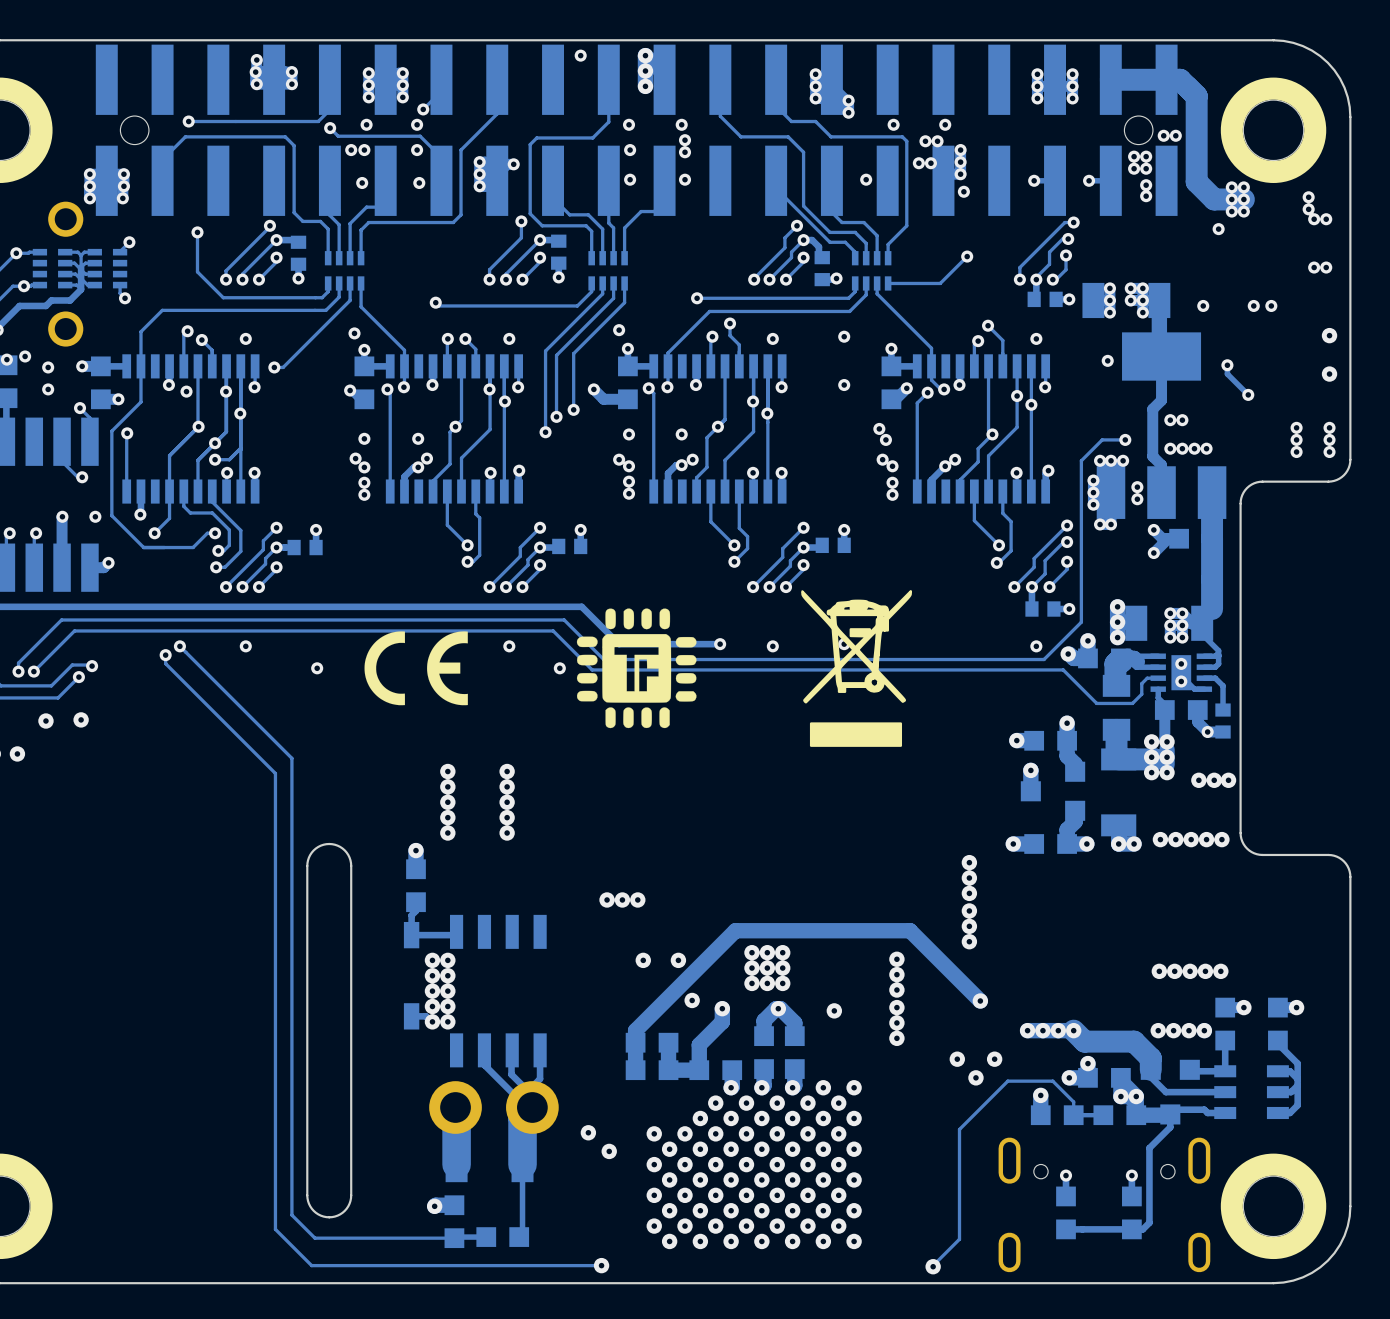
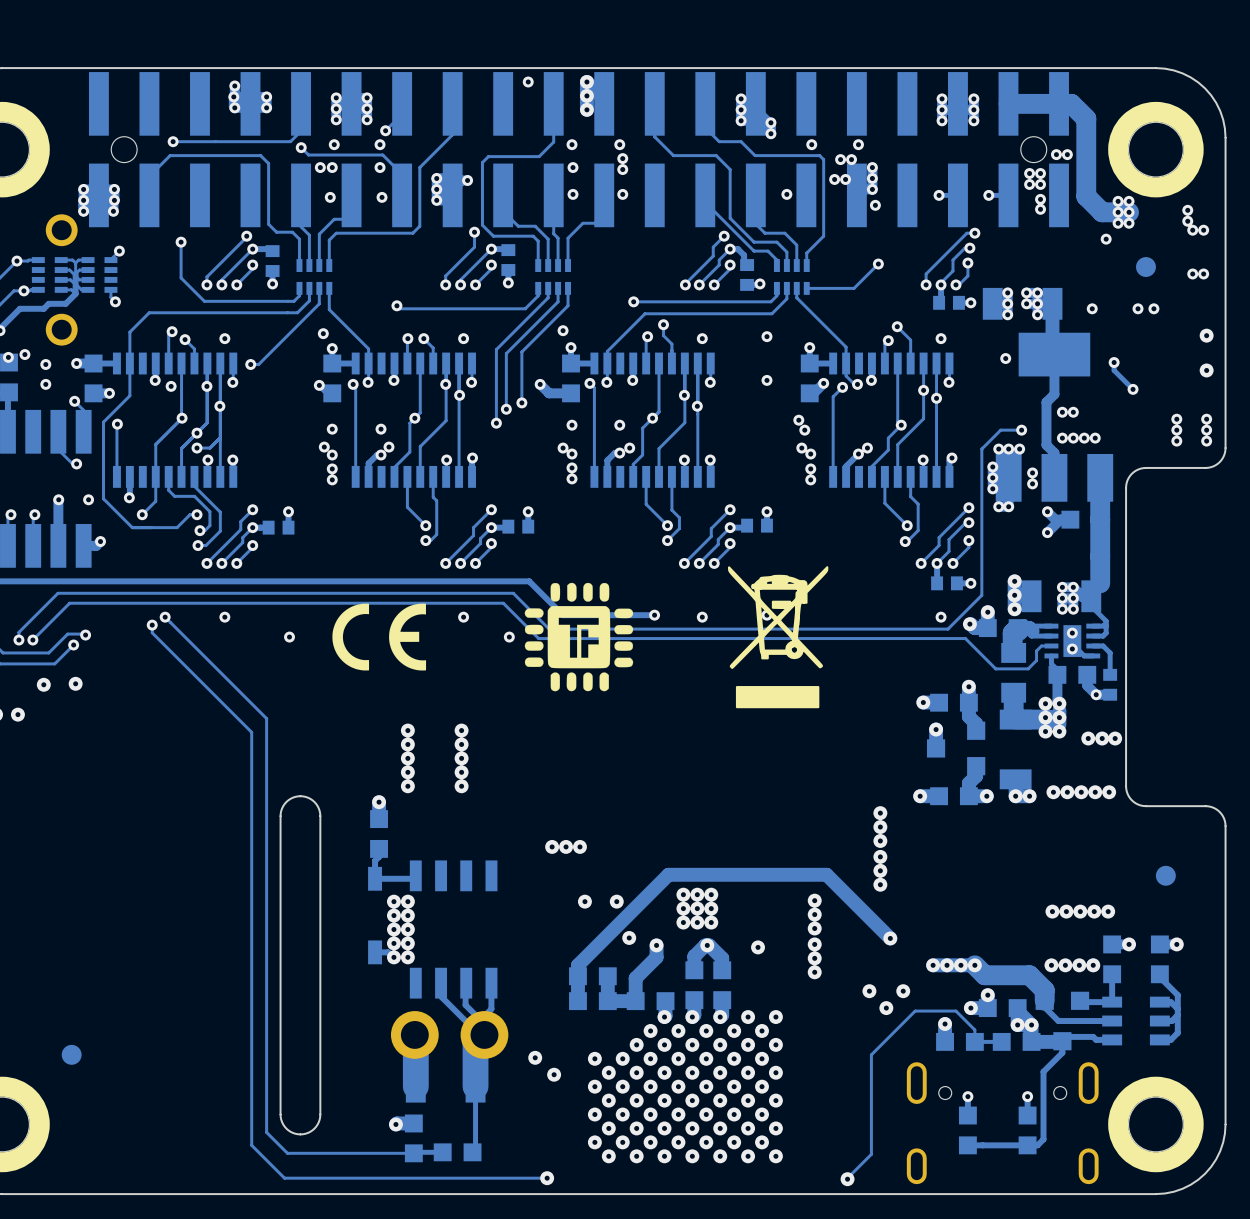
part: none -> (1145, 267)
part: none -> (1165, 875)
part: none -> (71, 1054)

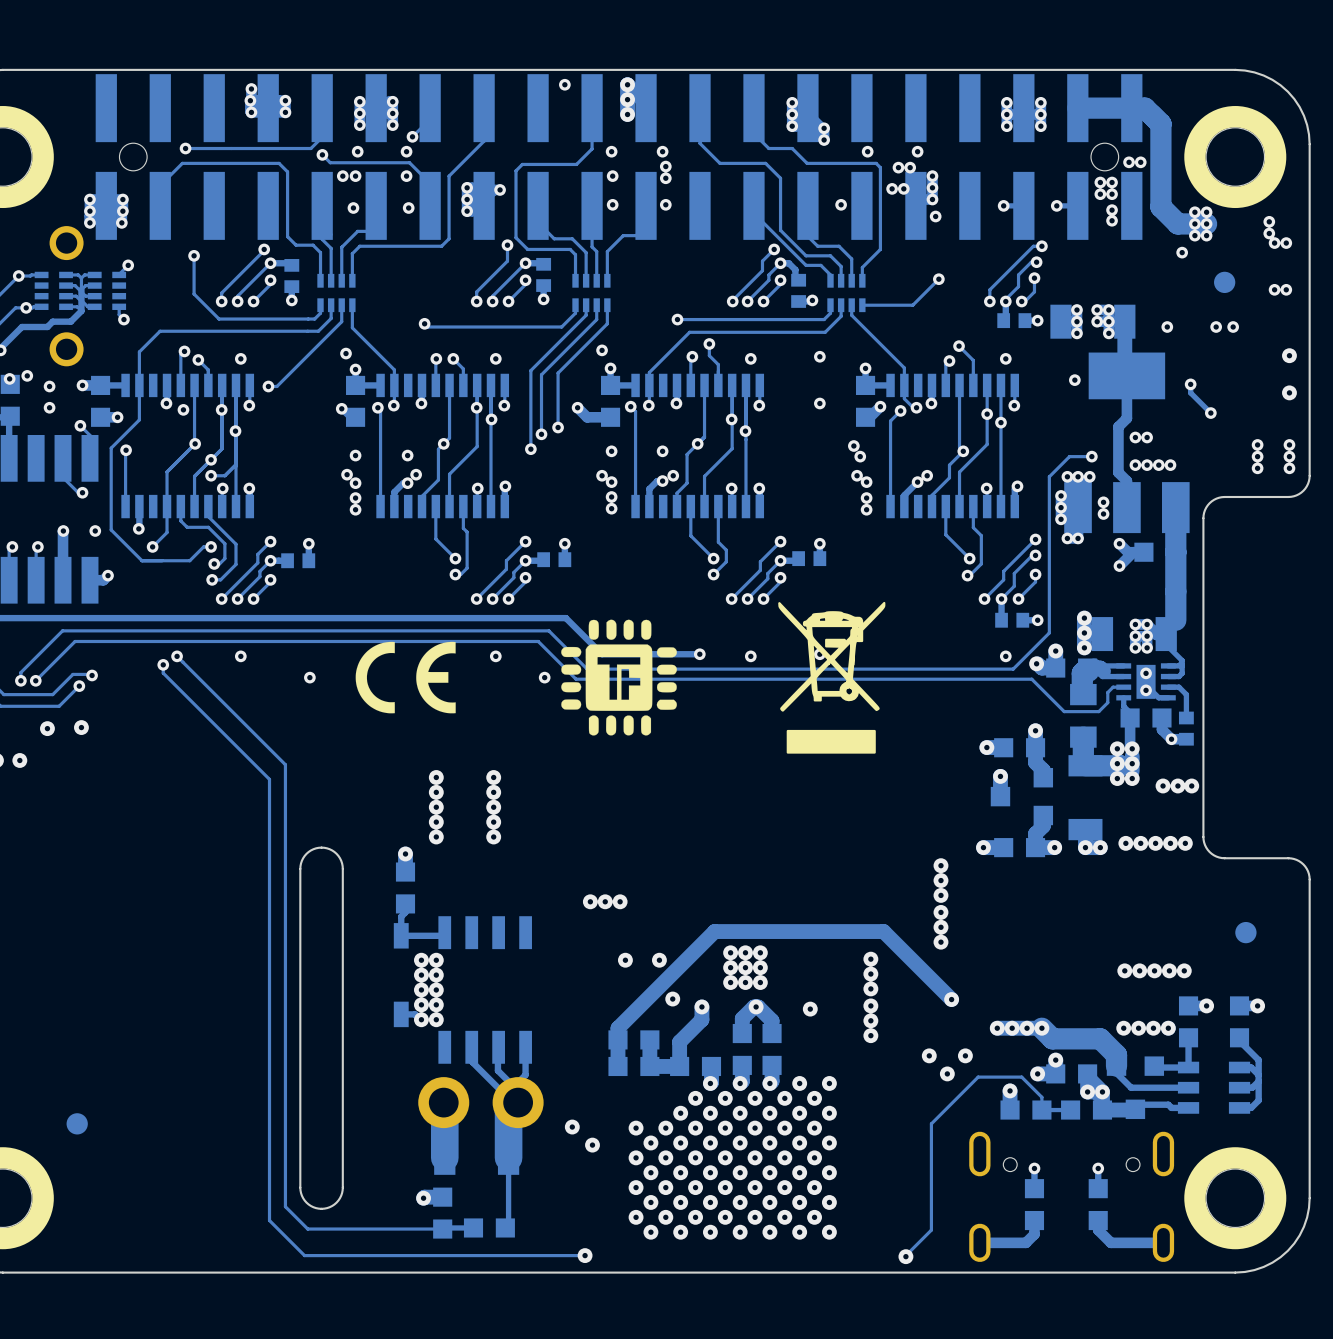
track: (1062, 1040) (1062, 1052) (1043, 1071) (1043, 1139) (1037, 1145) (967, 1145) -> (980, 1242) (1025, 1242) (1034, 1234) (1034, 1220)
track: none -> (1098, 1220) (1098, 1230) (1110, 1242) (1163, 1242)

